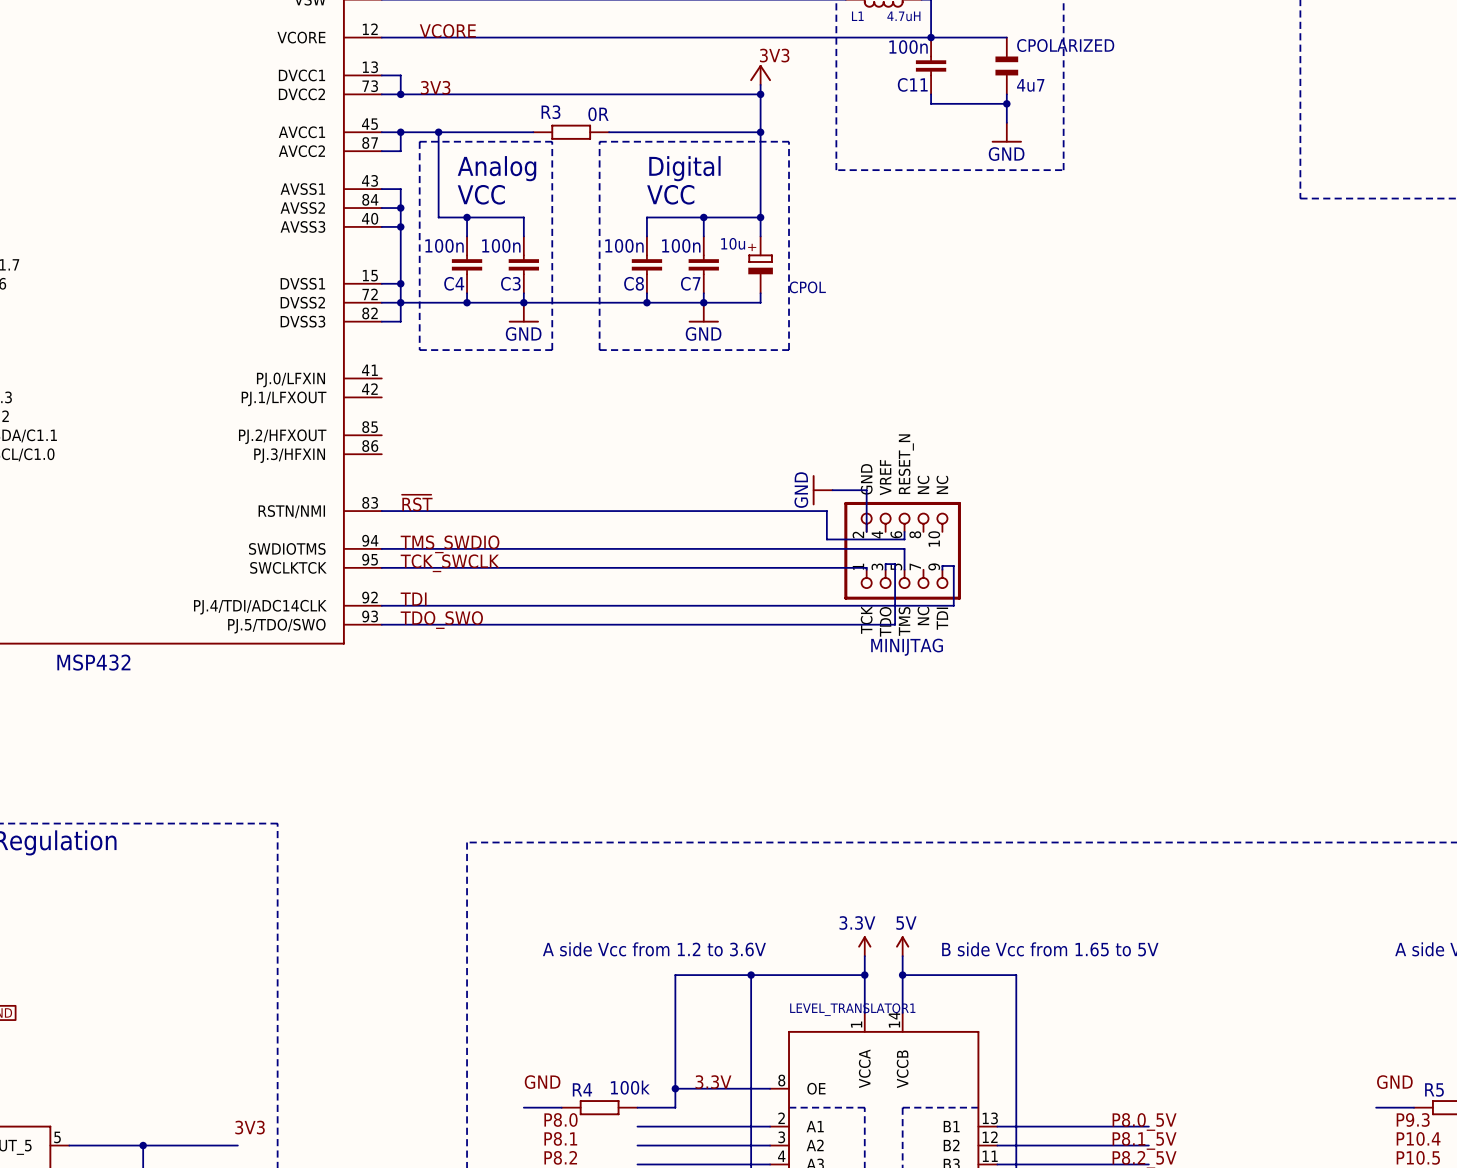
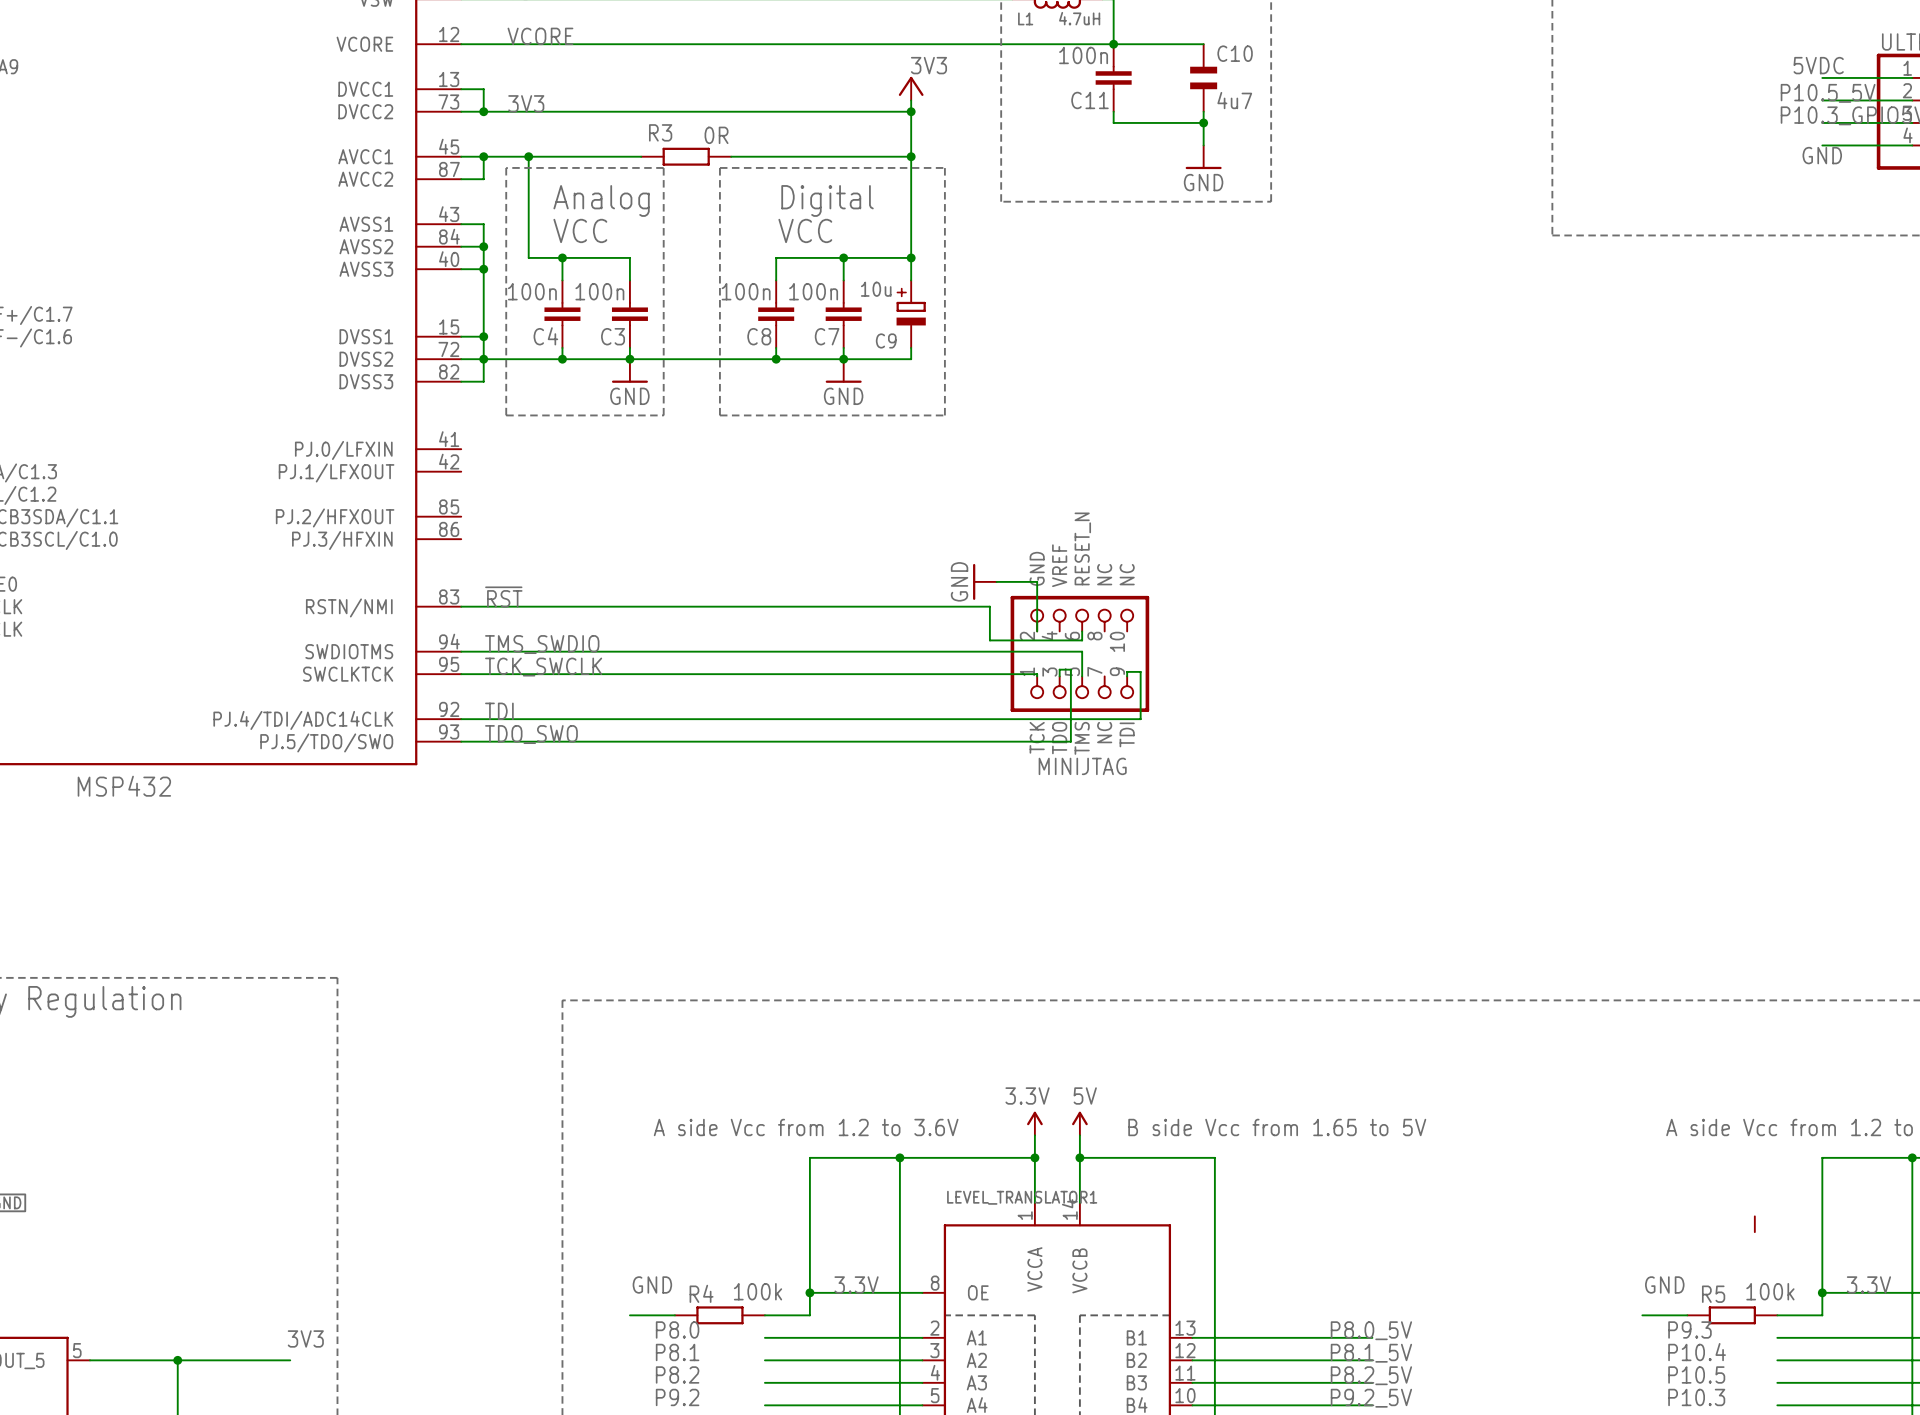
CPOLARIZED name: CPOLARIZED (1065, 45) -> C10 (1235, 53)
CPOL name: CPOL (807, 287) -> C9 (886, 340)

